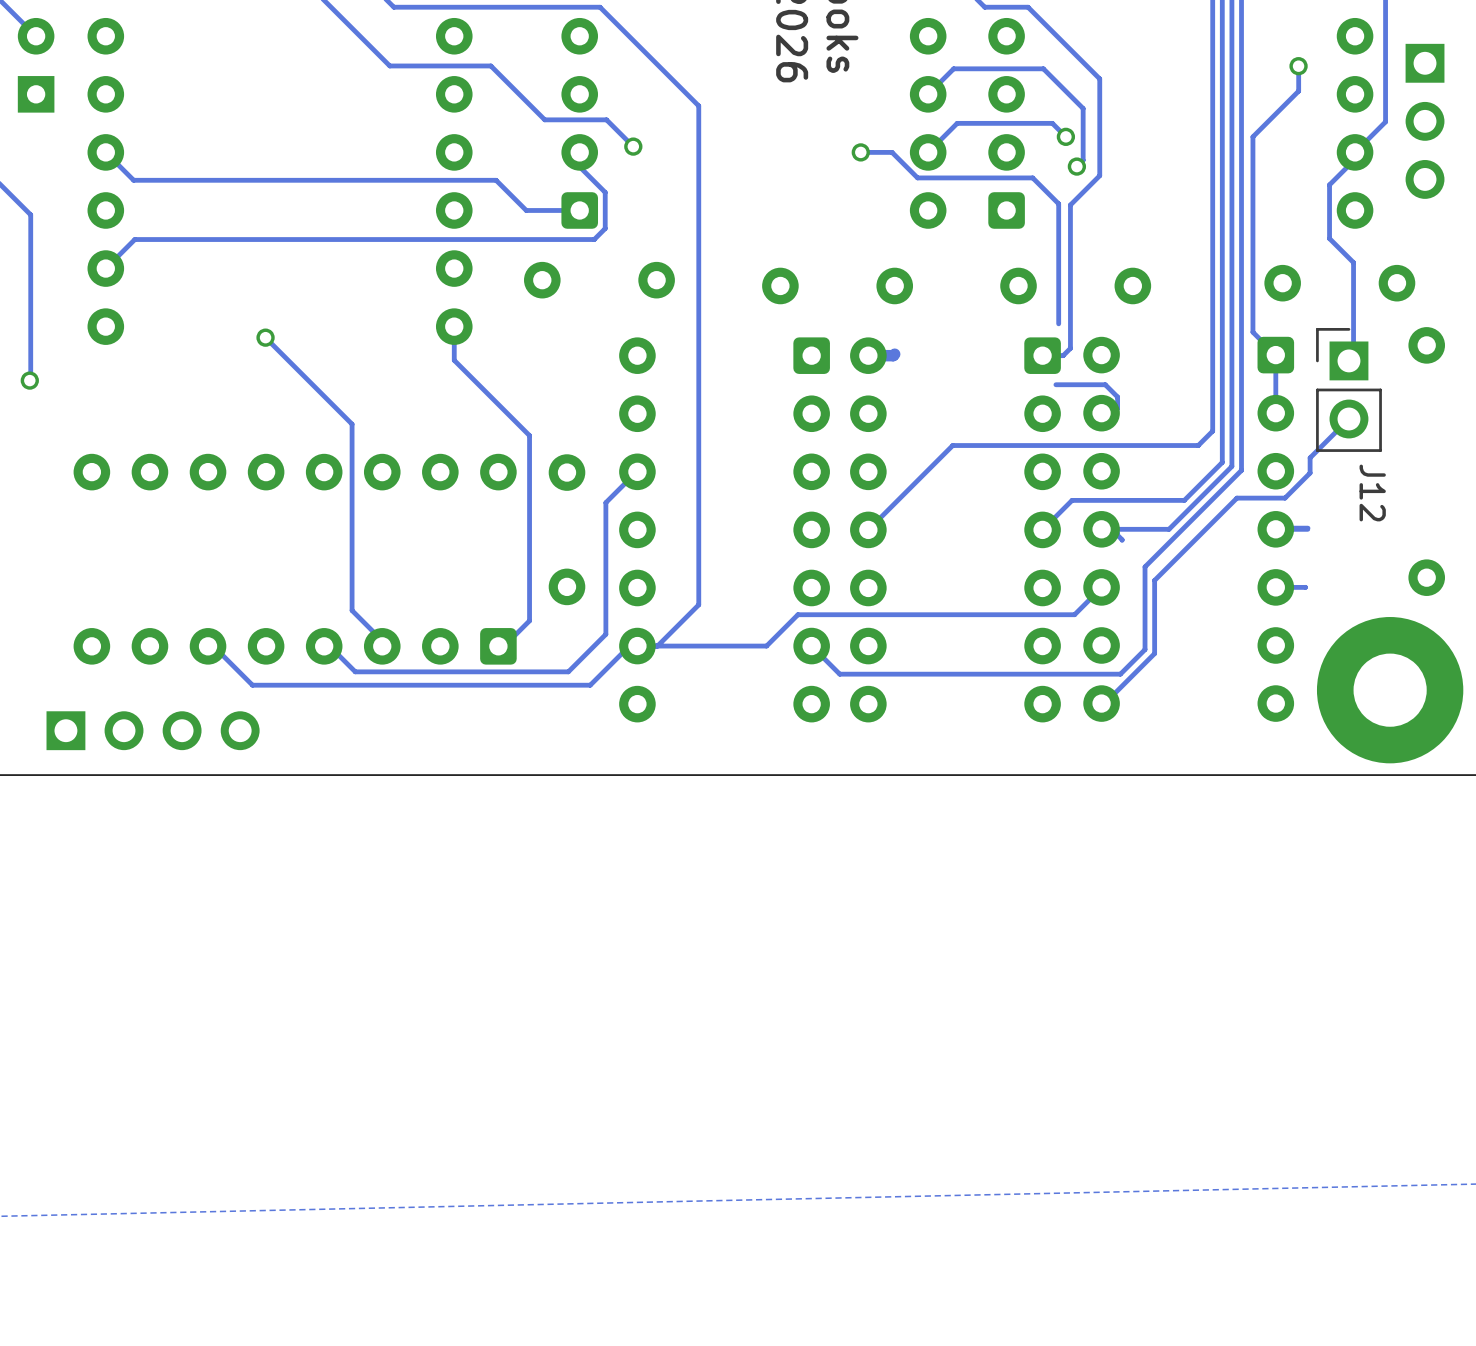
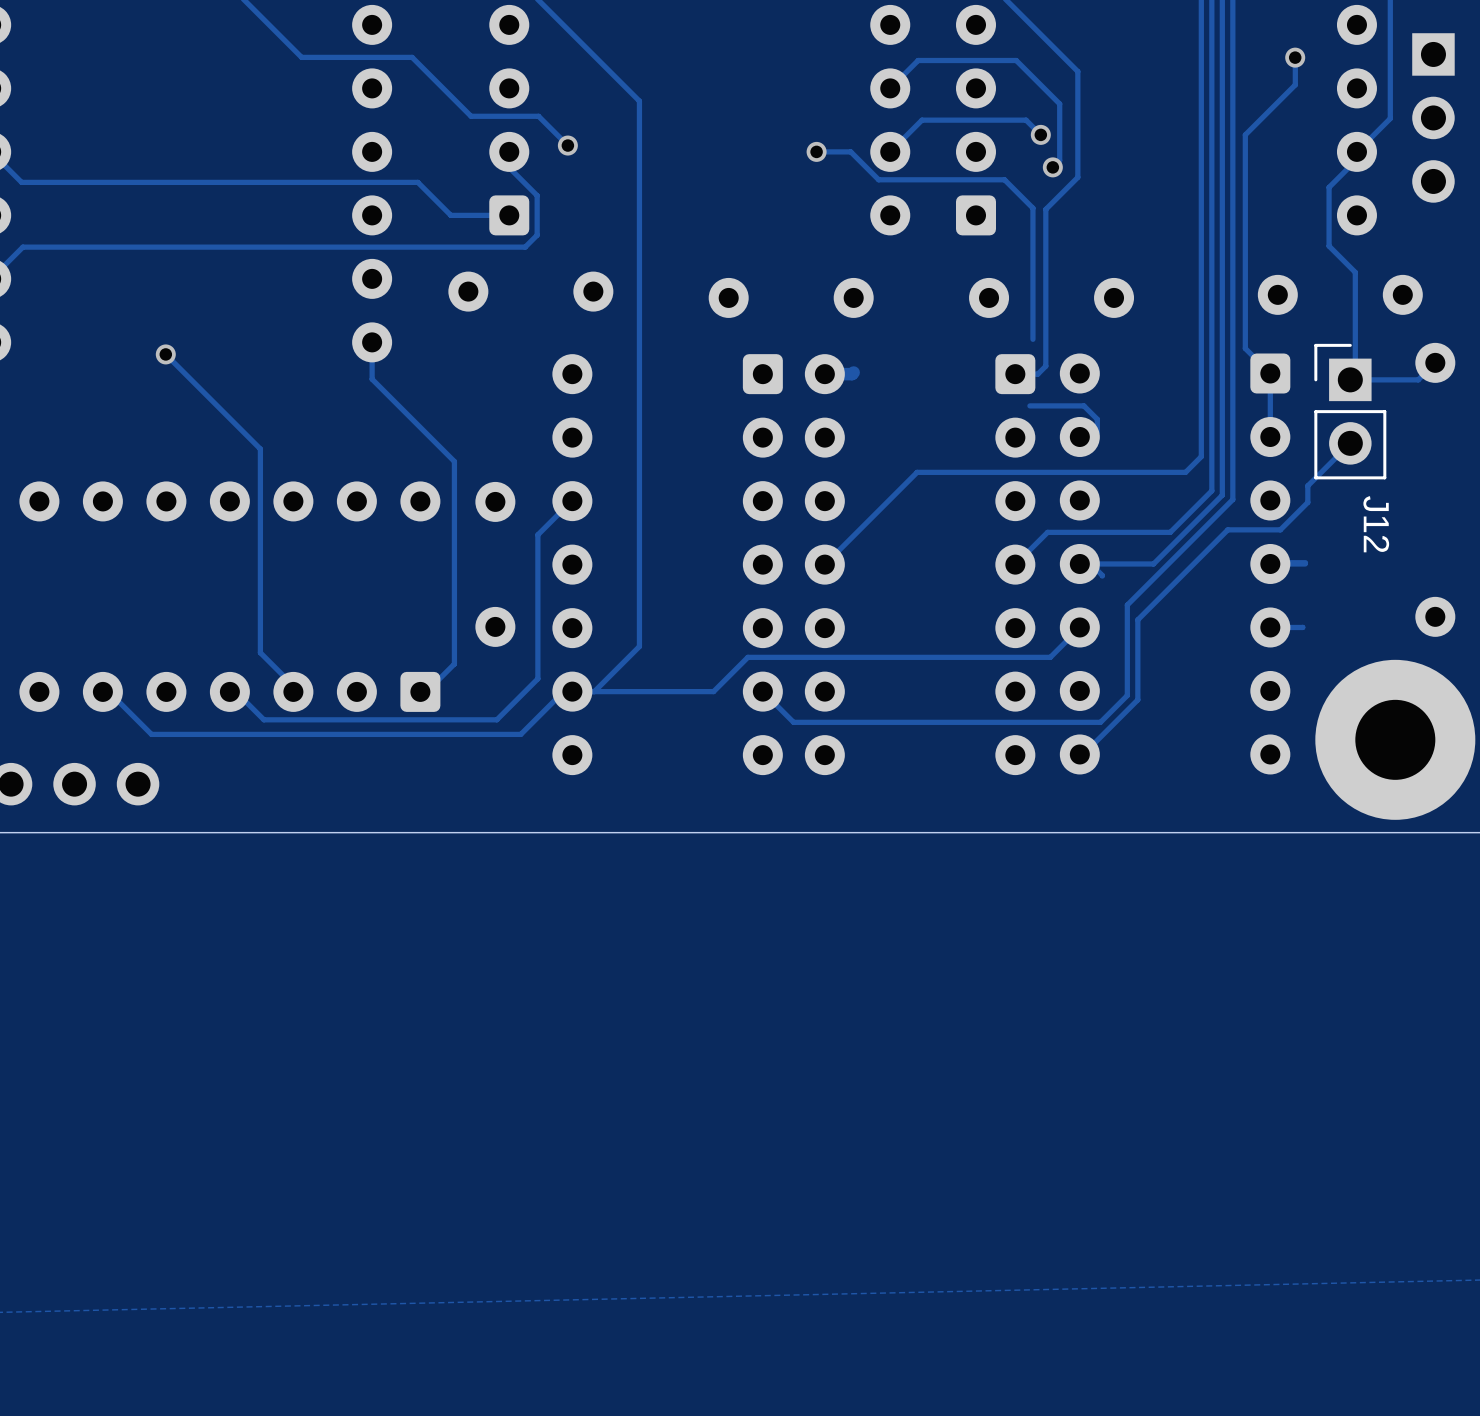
track: none -> (1435, 362) (1418, 379) (1350, 379)

